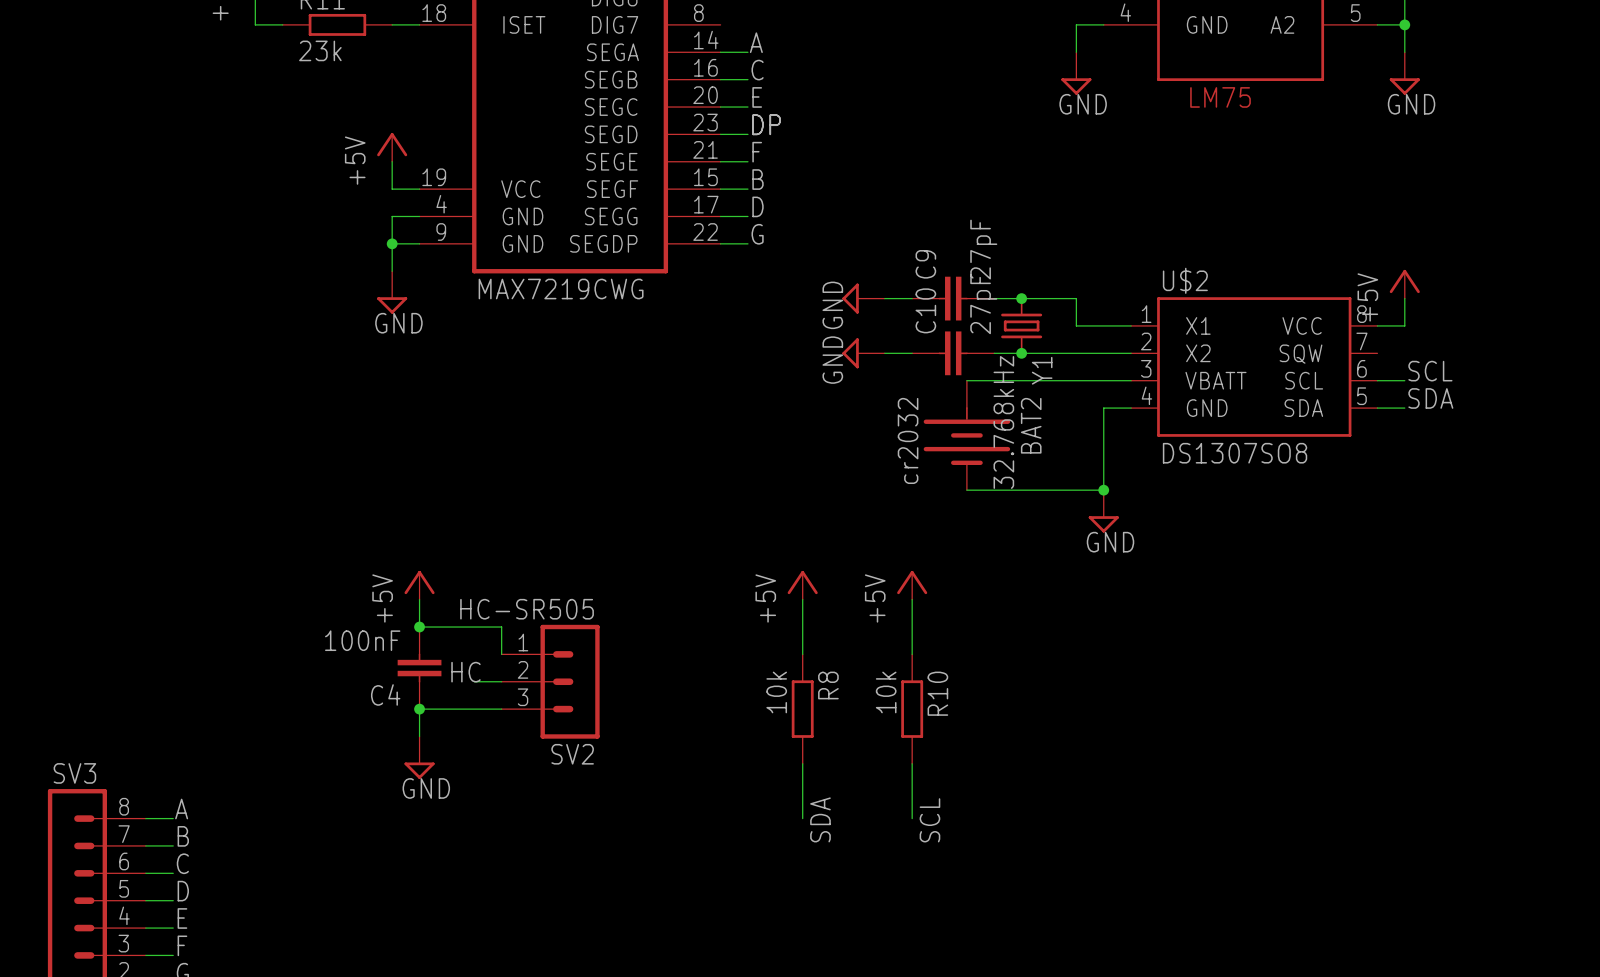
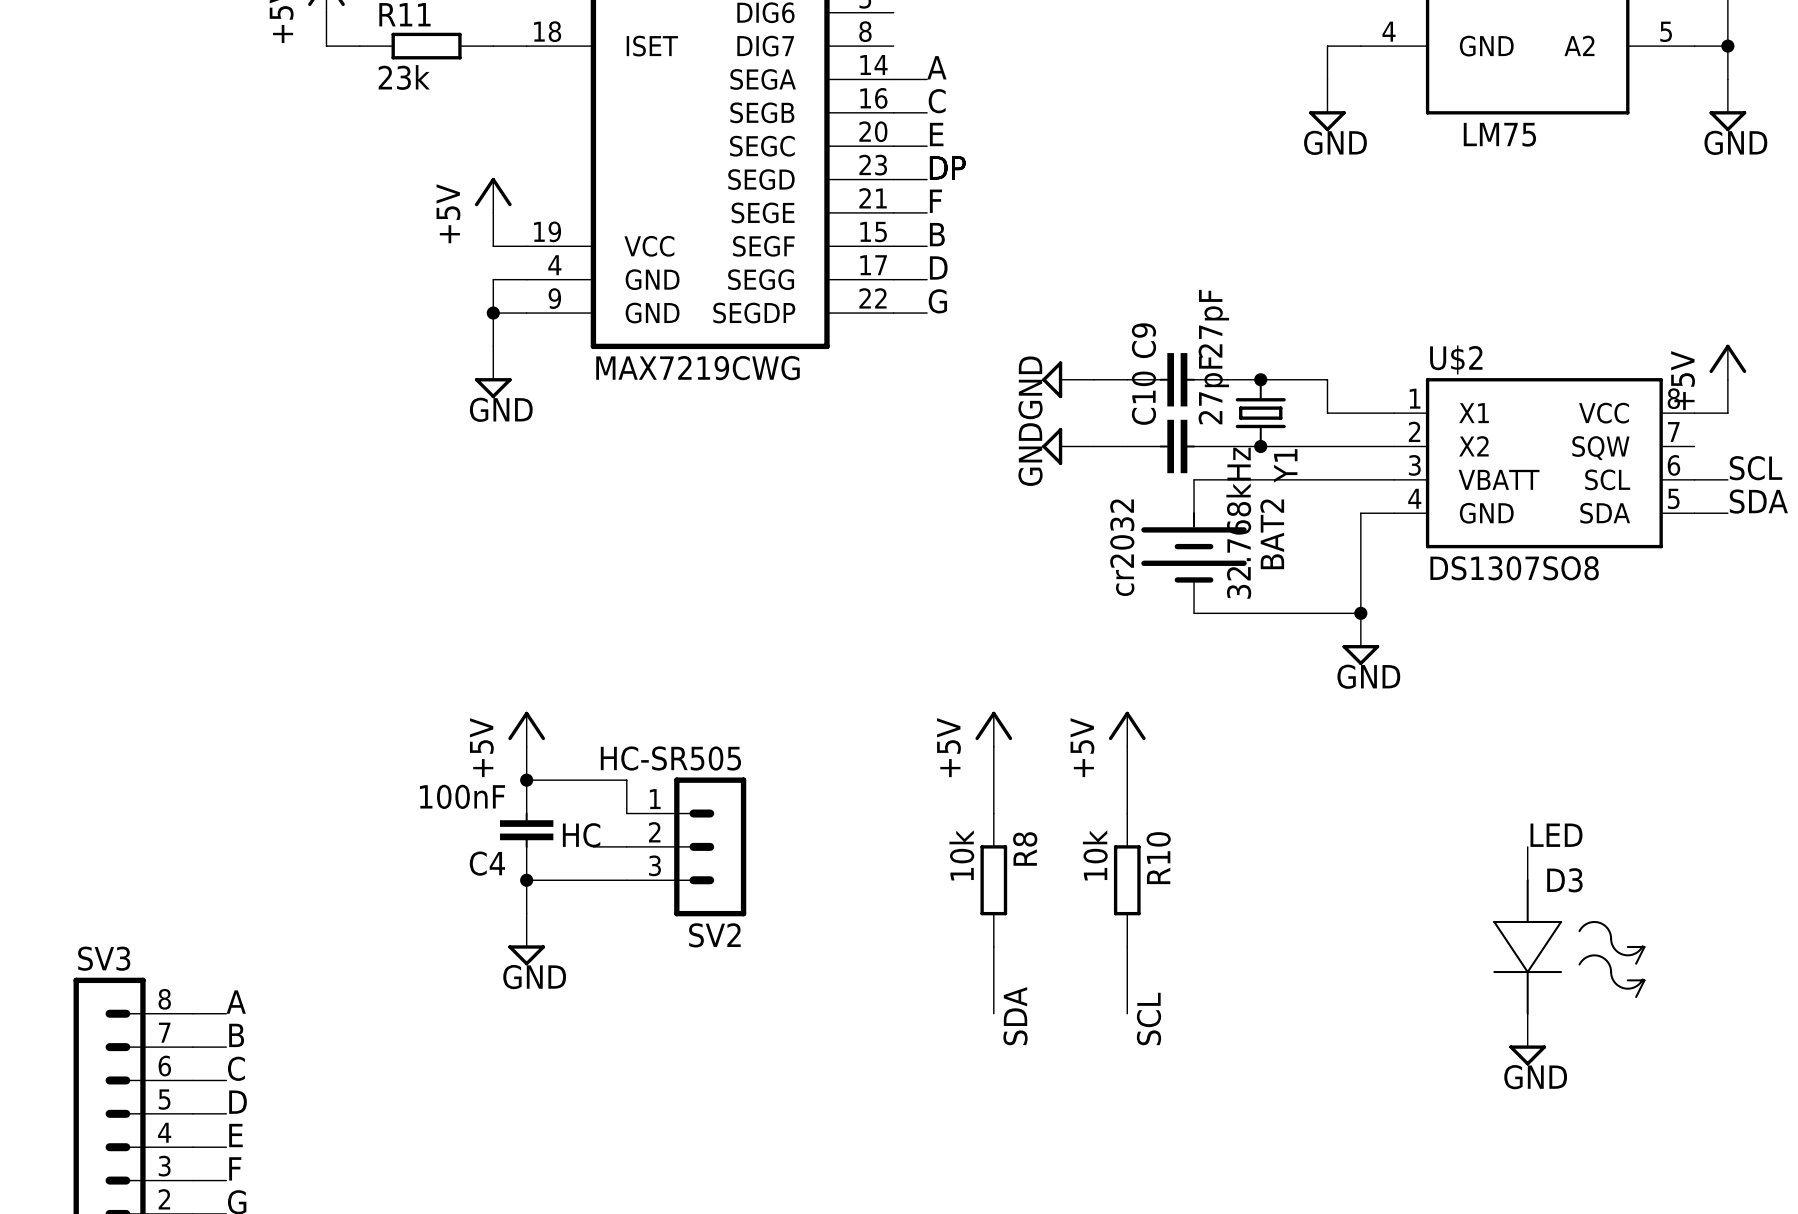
label: none -> LED (1556, 835)
wire: none -> (1527, 846) (1527, 880)
D3: none -> (1569, 947)
power symbol: none -> GND (1527, 1039)

